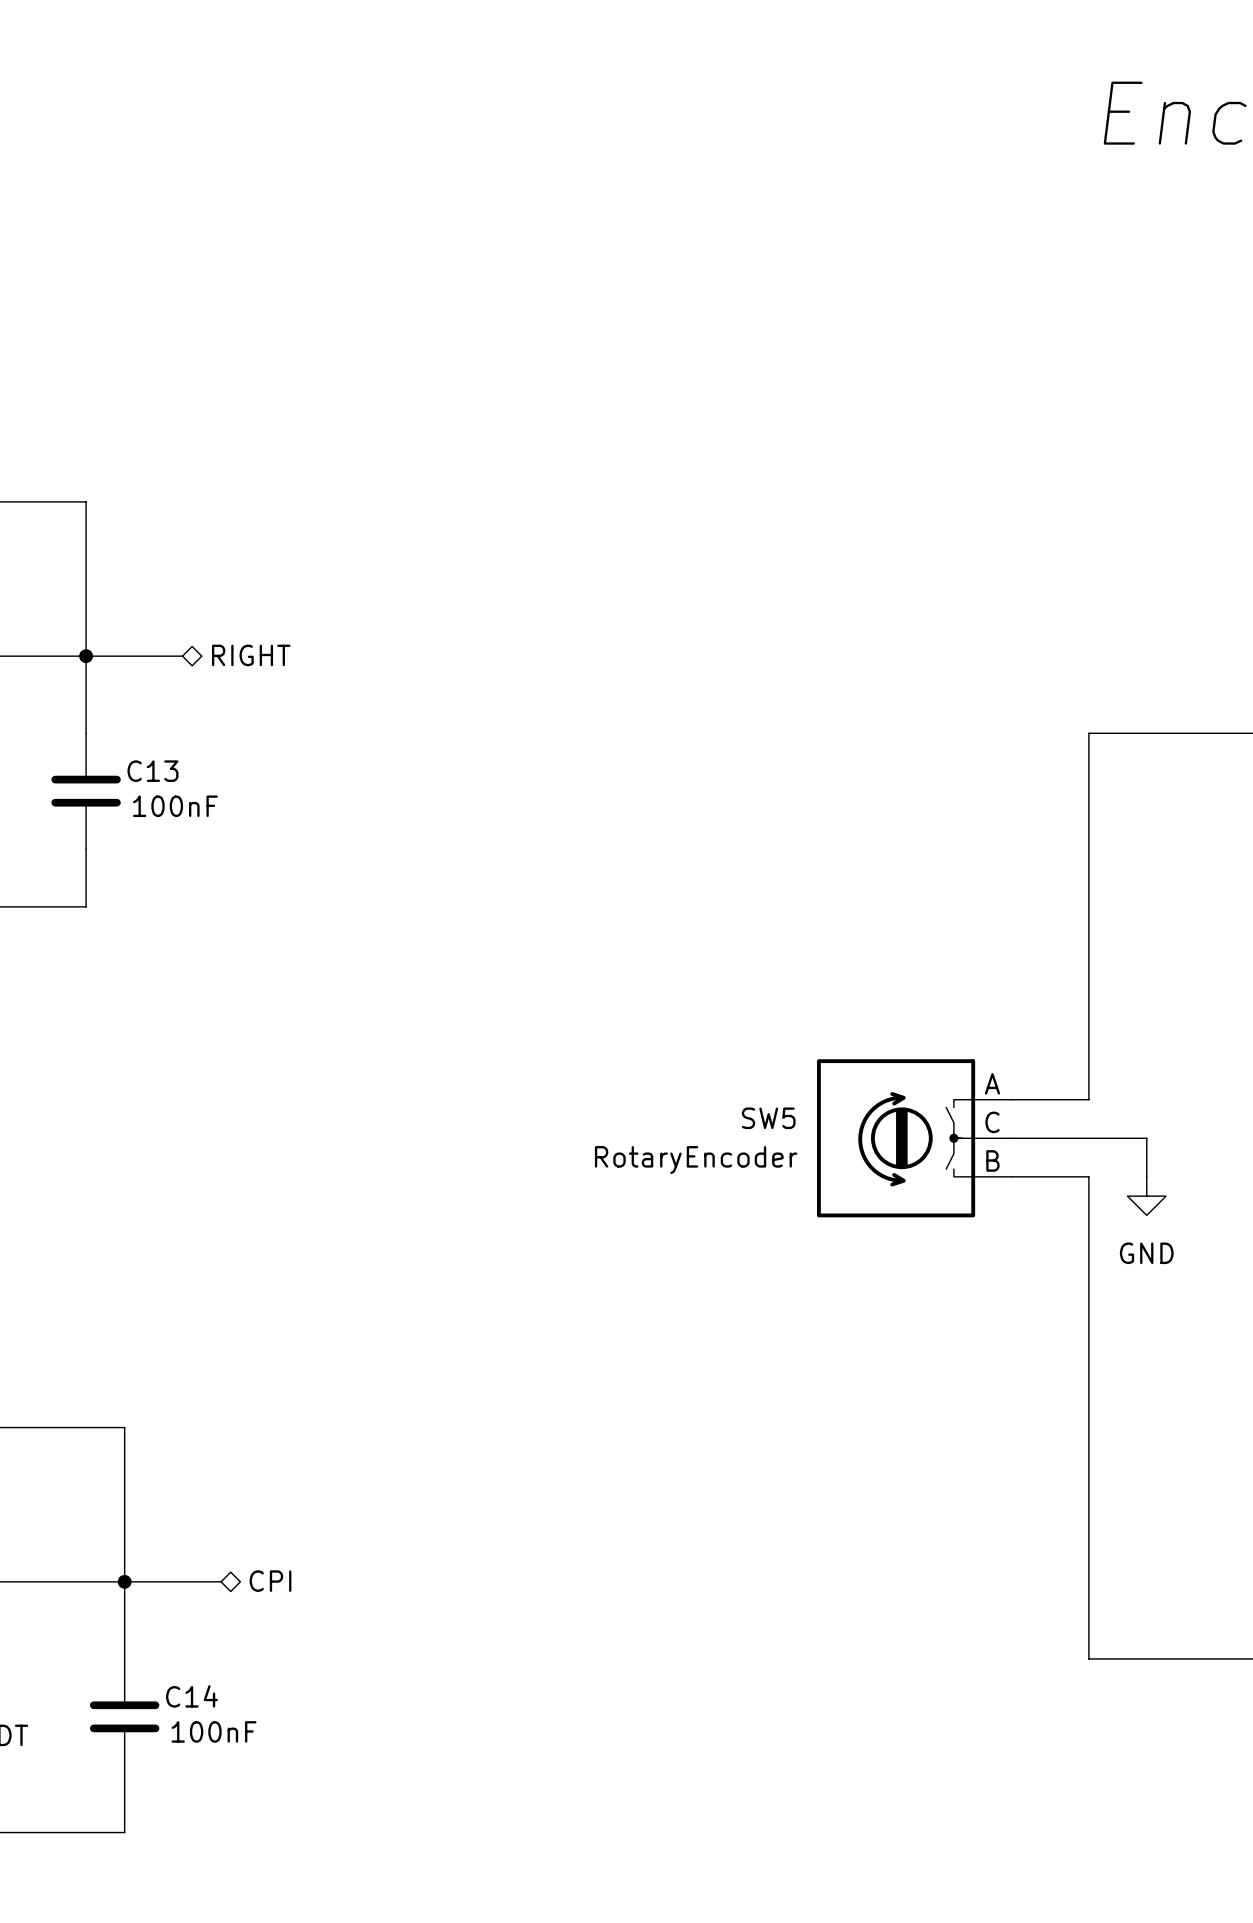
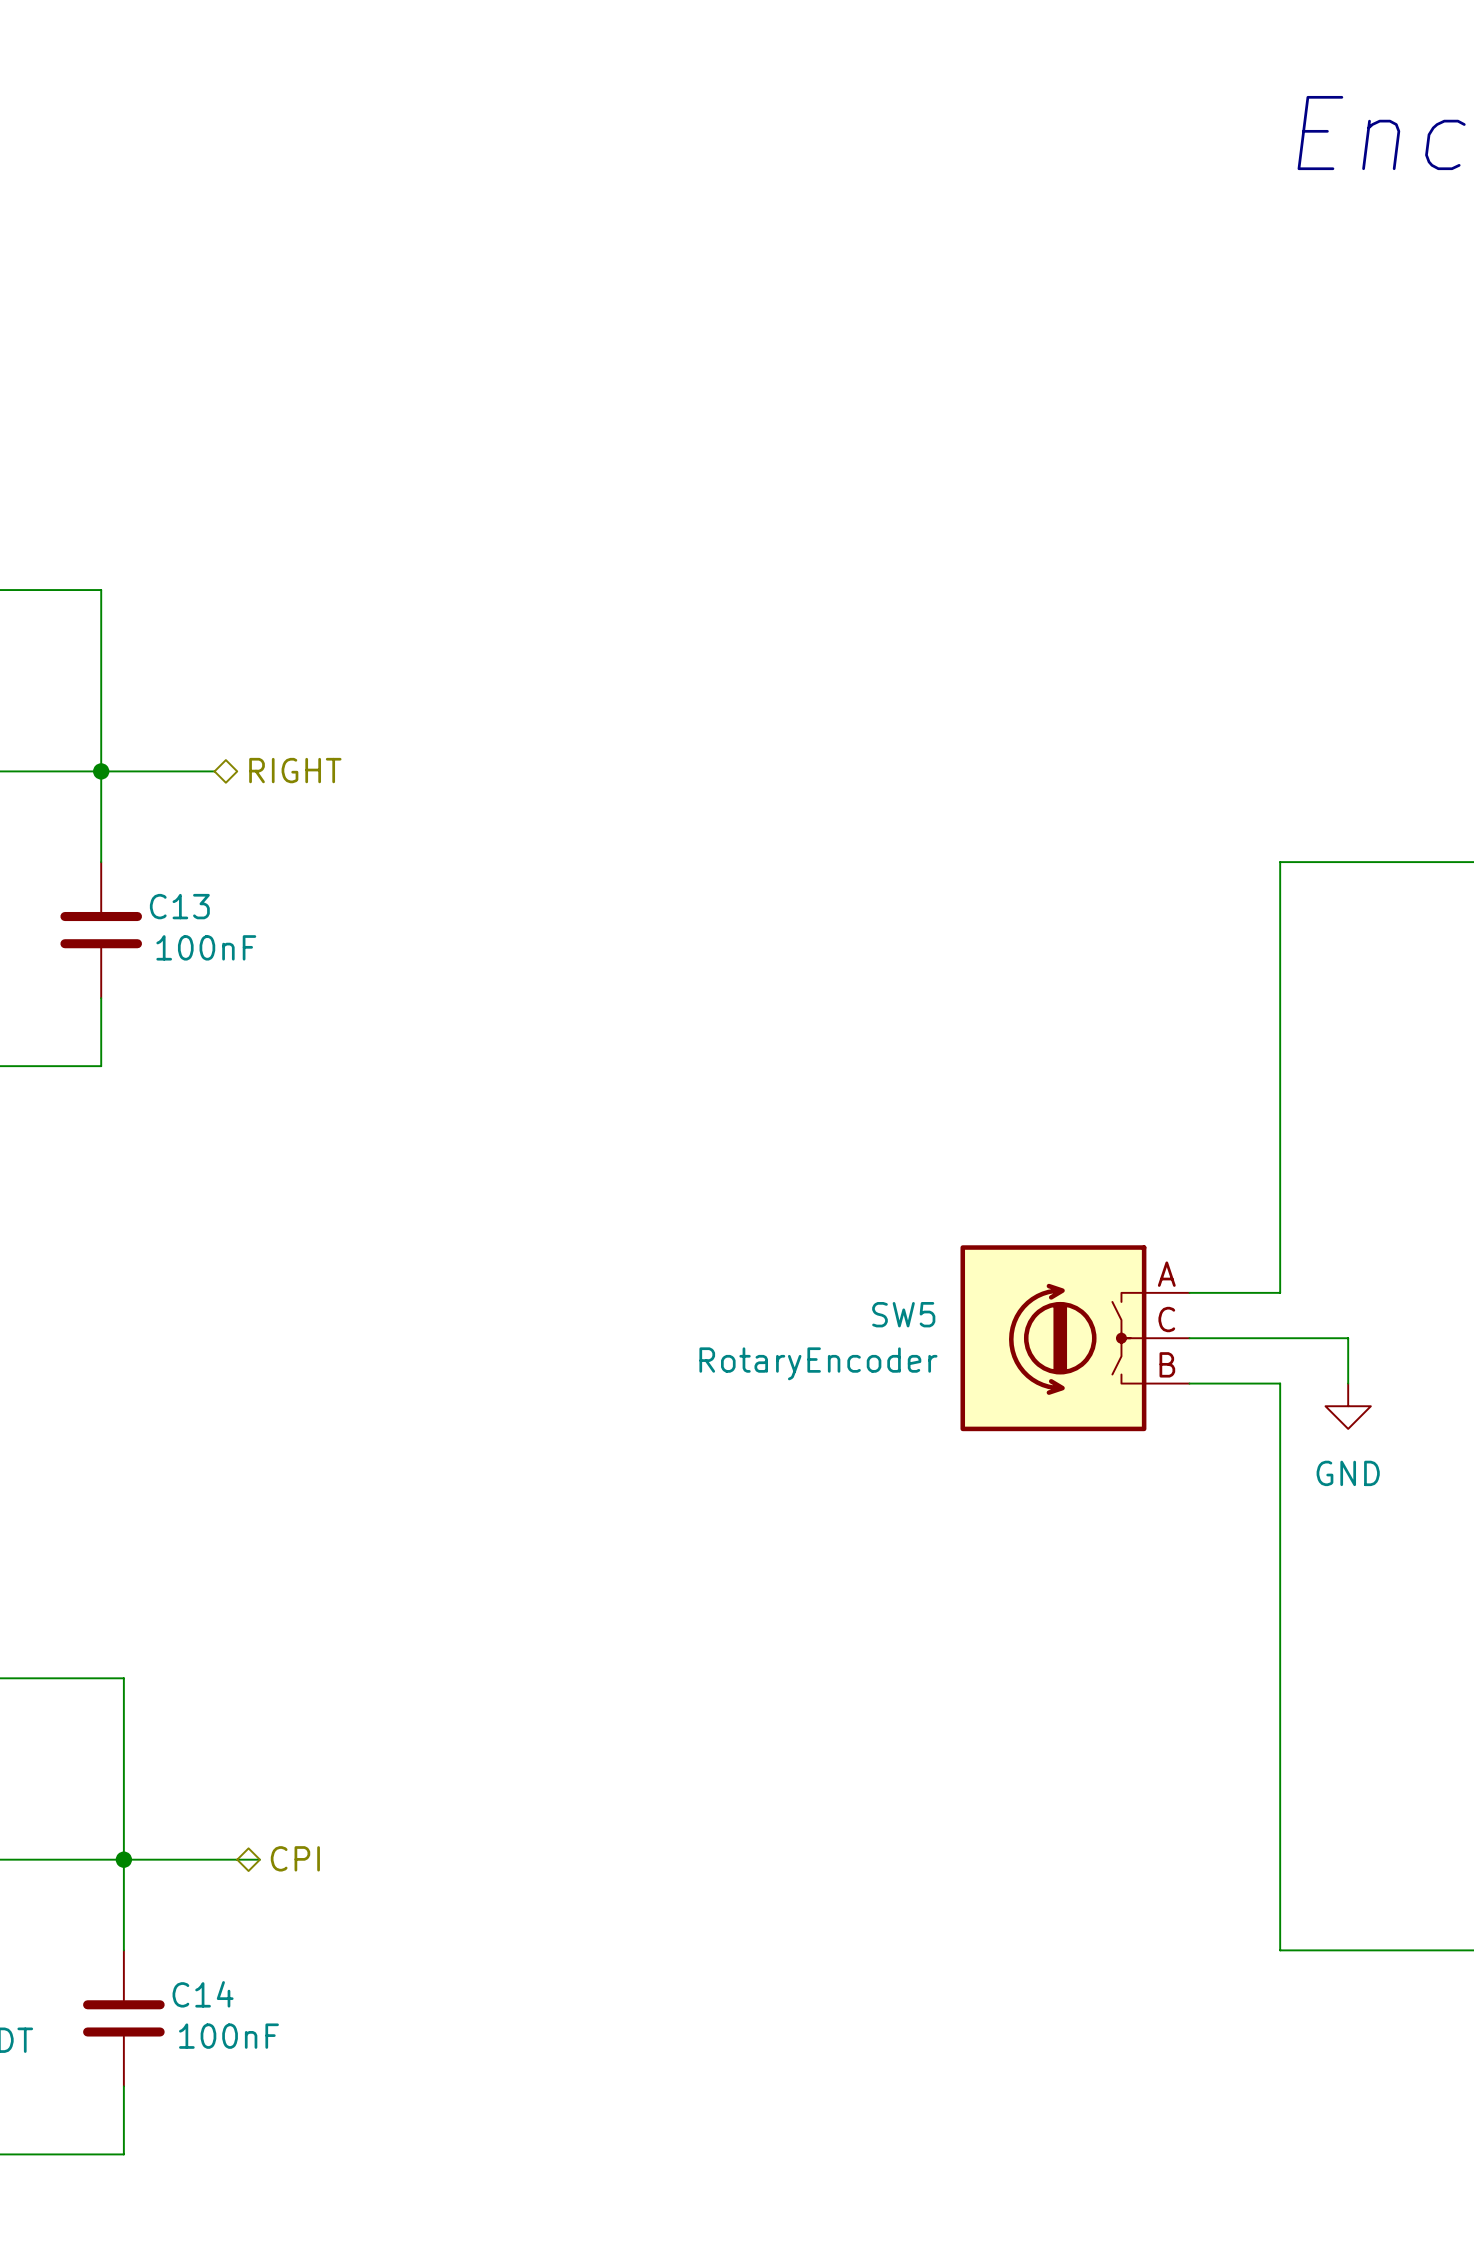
wire: (105, 1427) (124, 1427) (124, 1658) -> (123, 1678) (123, 1950)
junction position: (124, 1581) -> (123, 1859)
hierarchical label position: CPI (270, 1581) -> CPI (295, 1858)
C14 position: (124, 1716) -> (123, 2018)
wire: (124, 1774) (124, 1832) (105, 1832) -> (123, 2086) (123, 2154)

